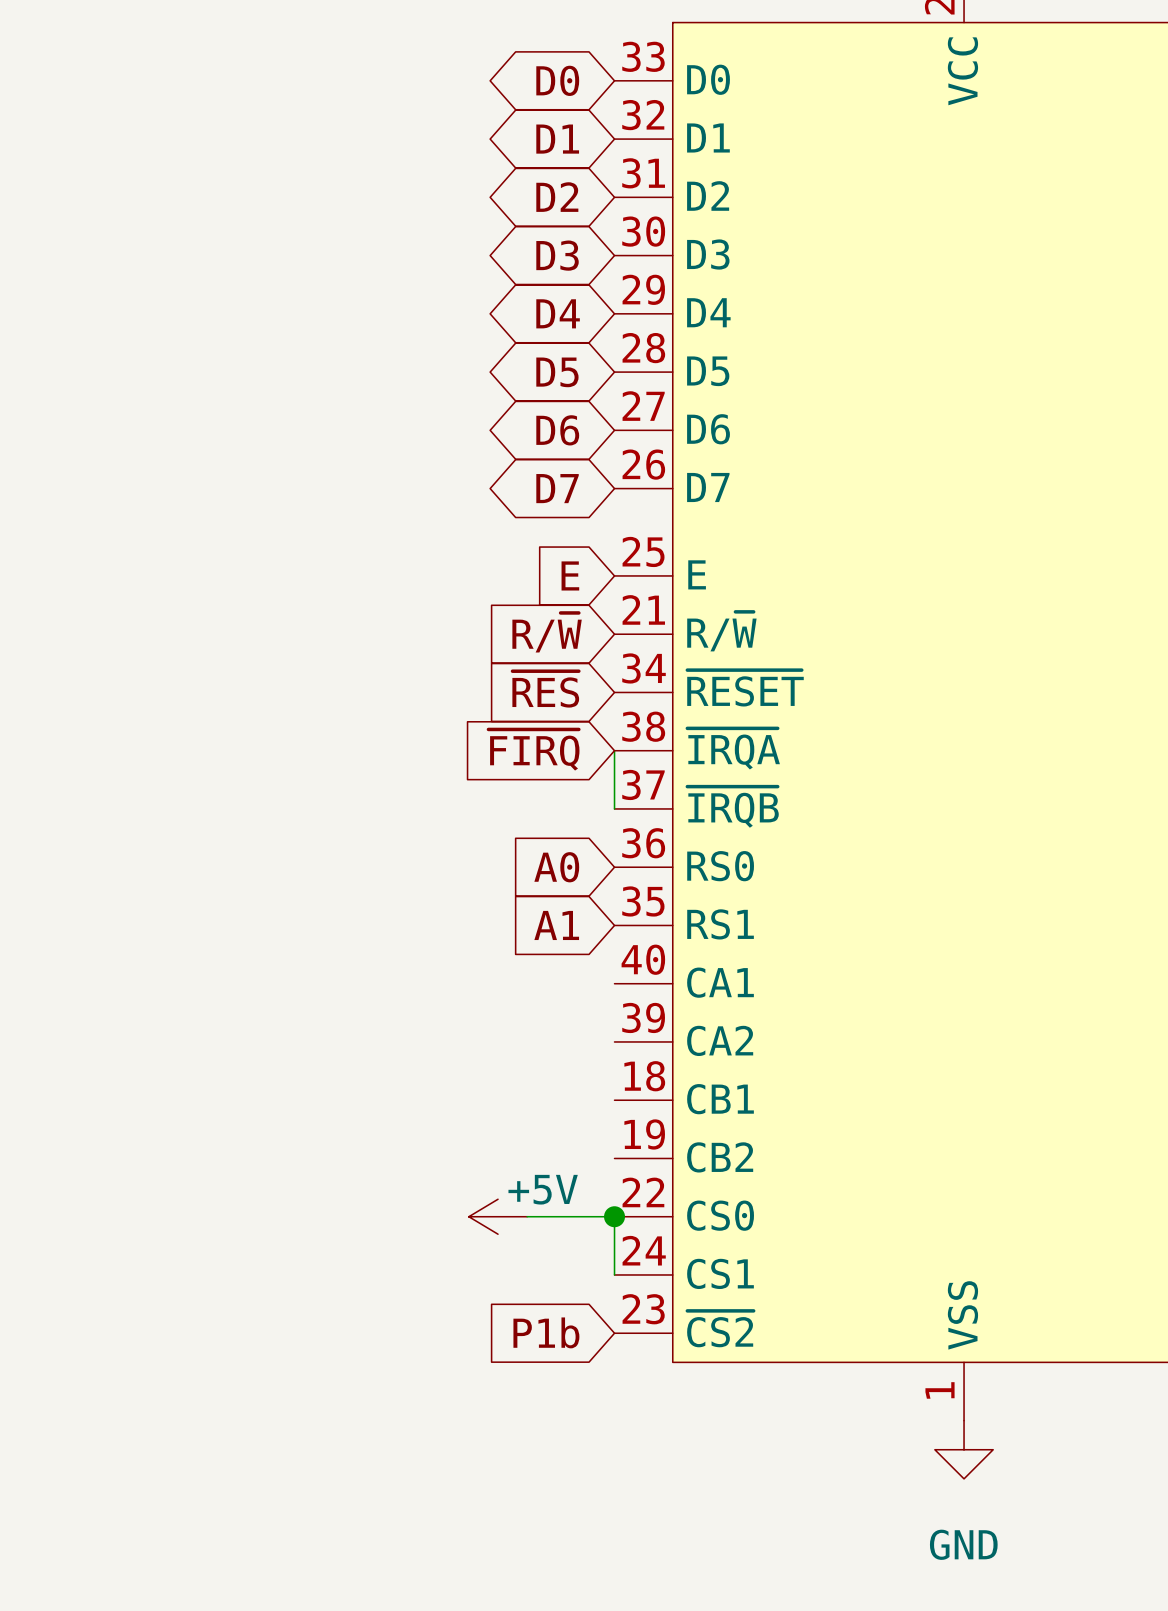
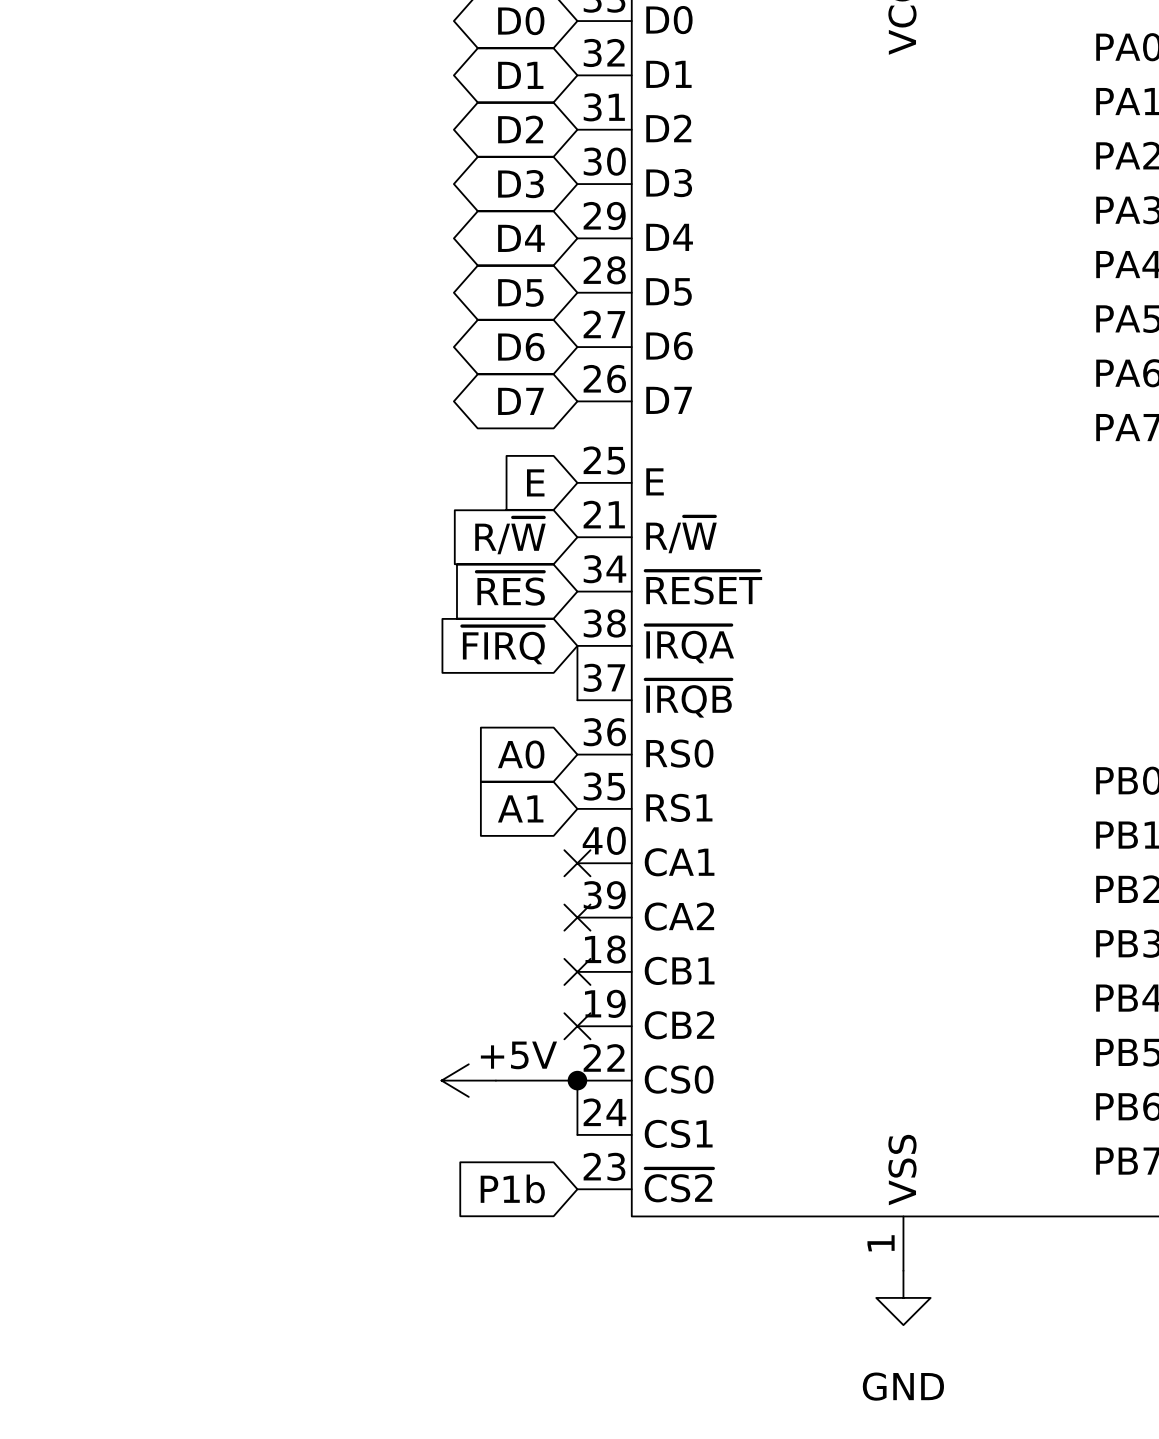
no-connect mark: none -> (577, 863)
no-connect mark: none -> (577, 917)
no-connect mark: none -> (577, 971)
no-connect mark: none -> (577, 1026)

